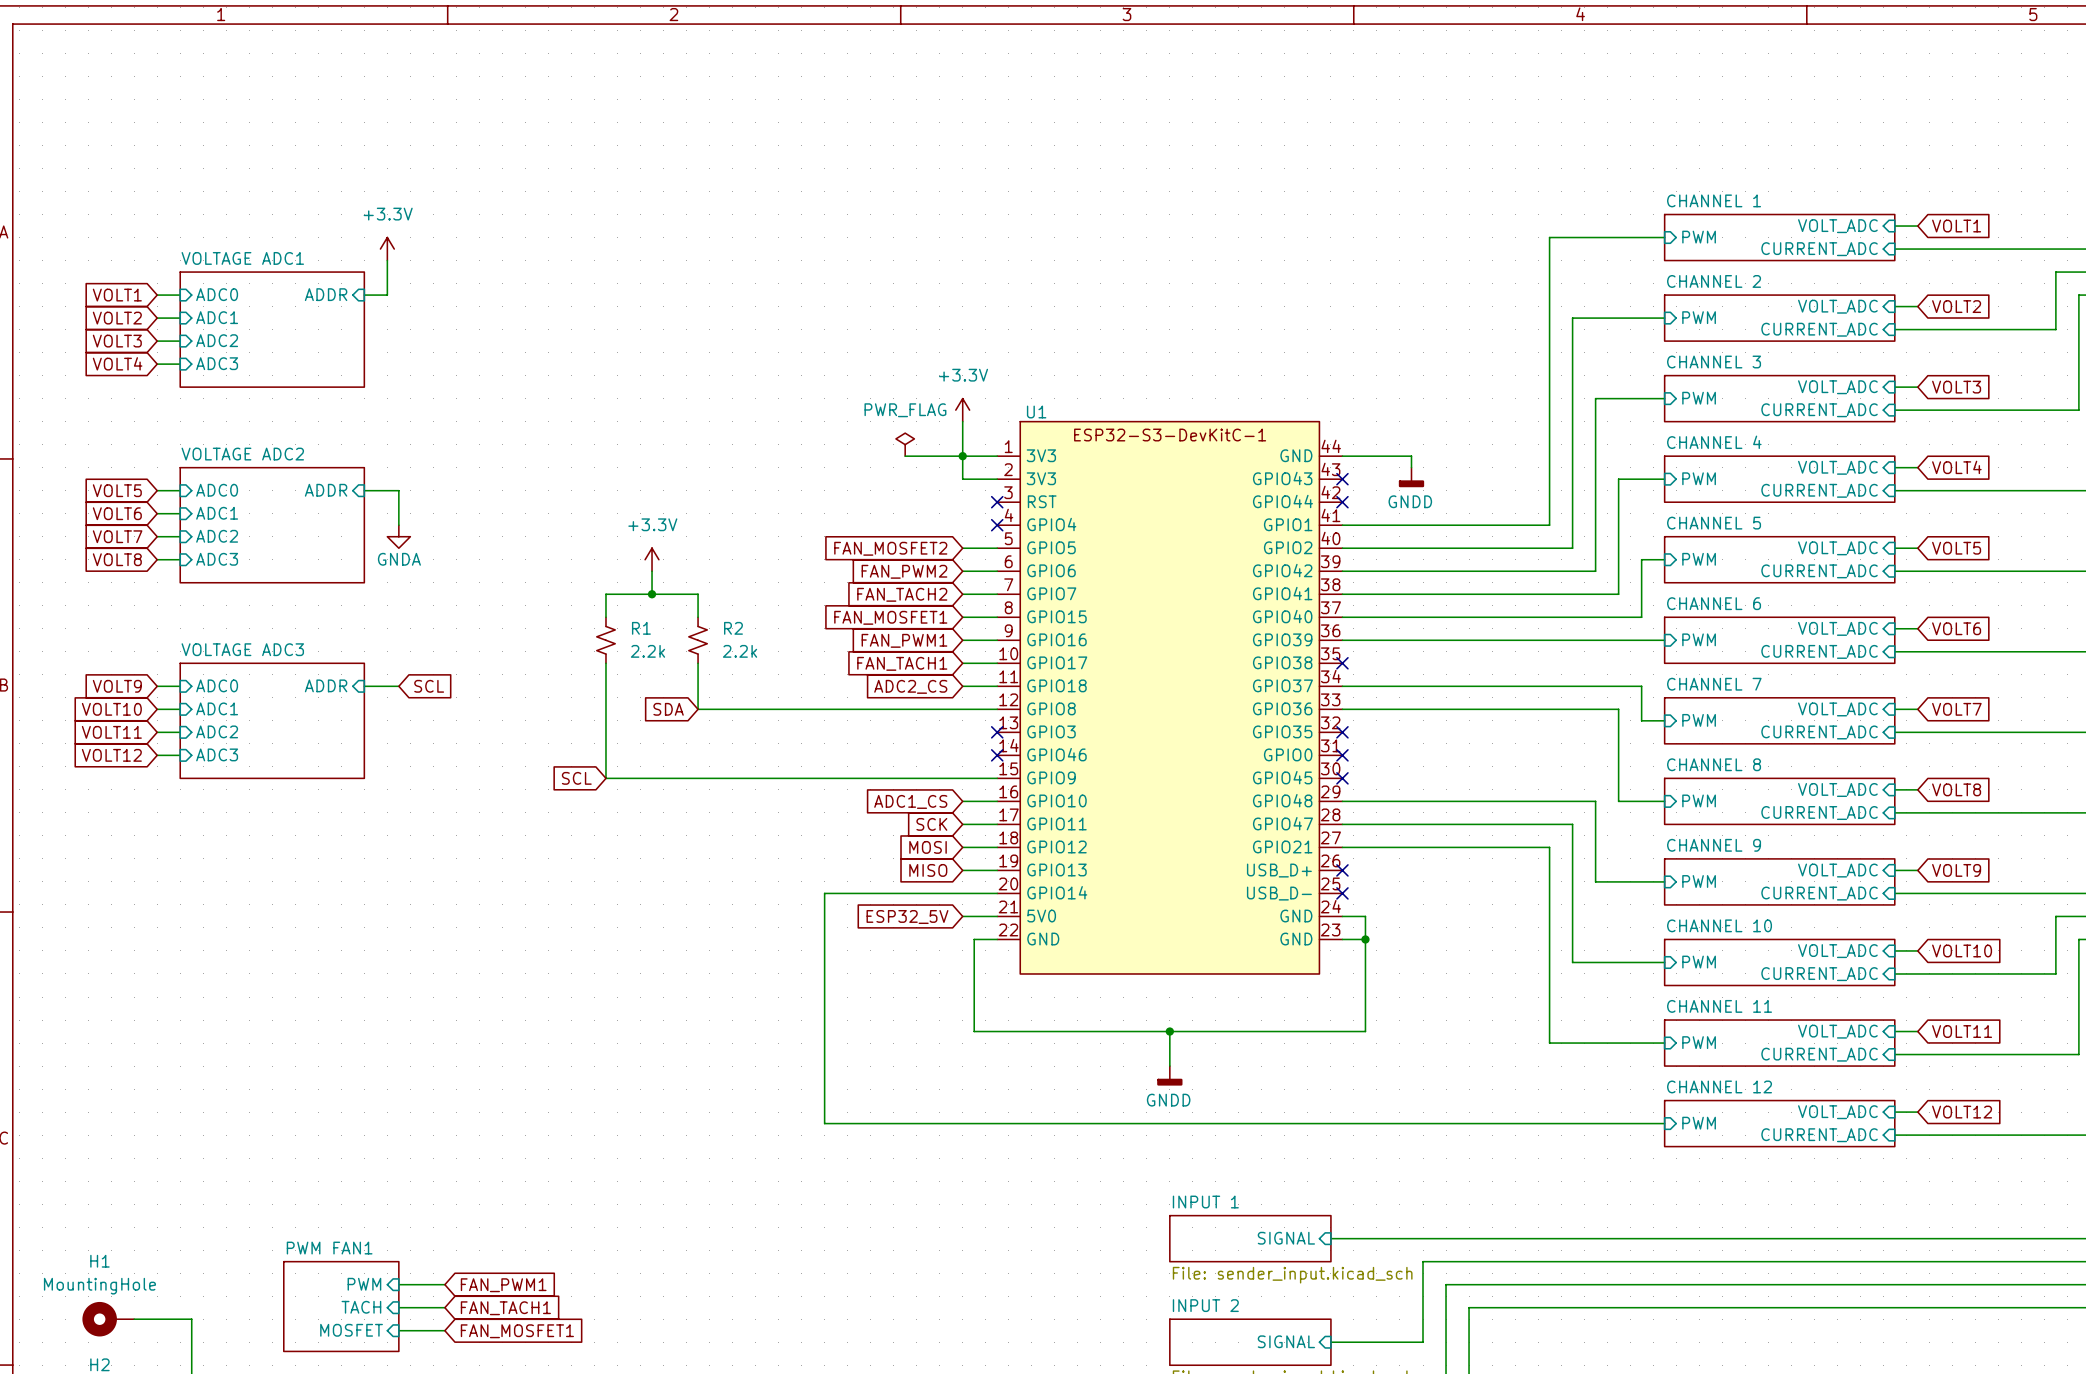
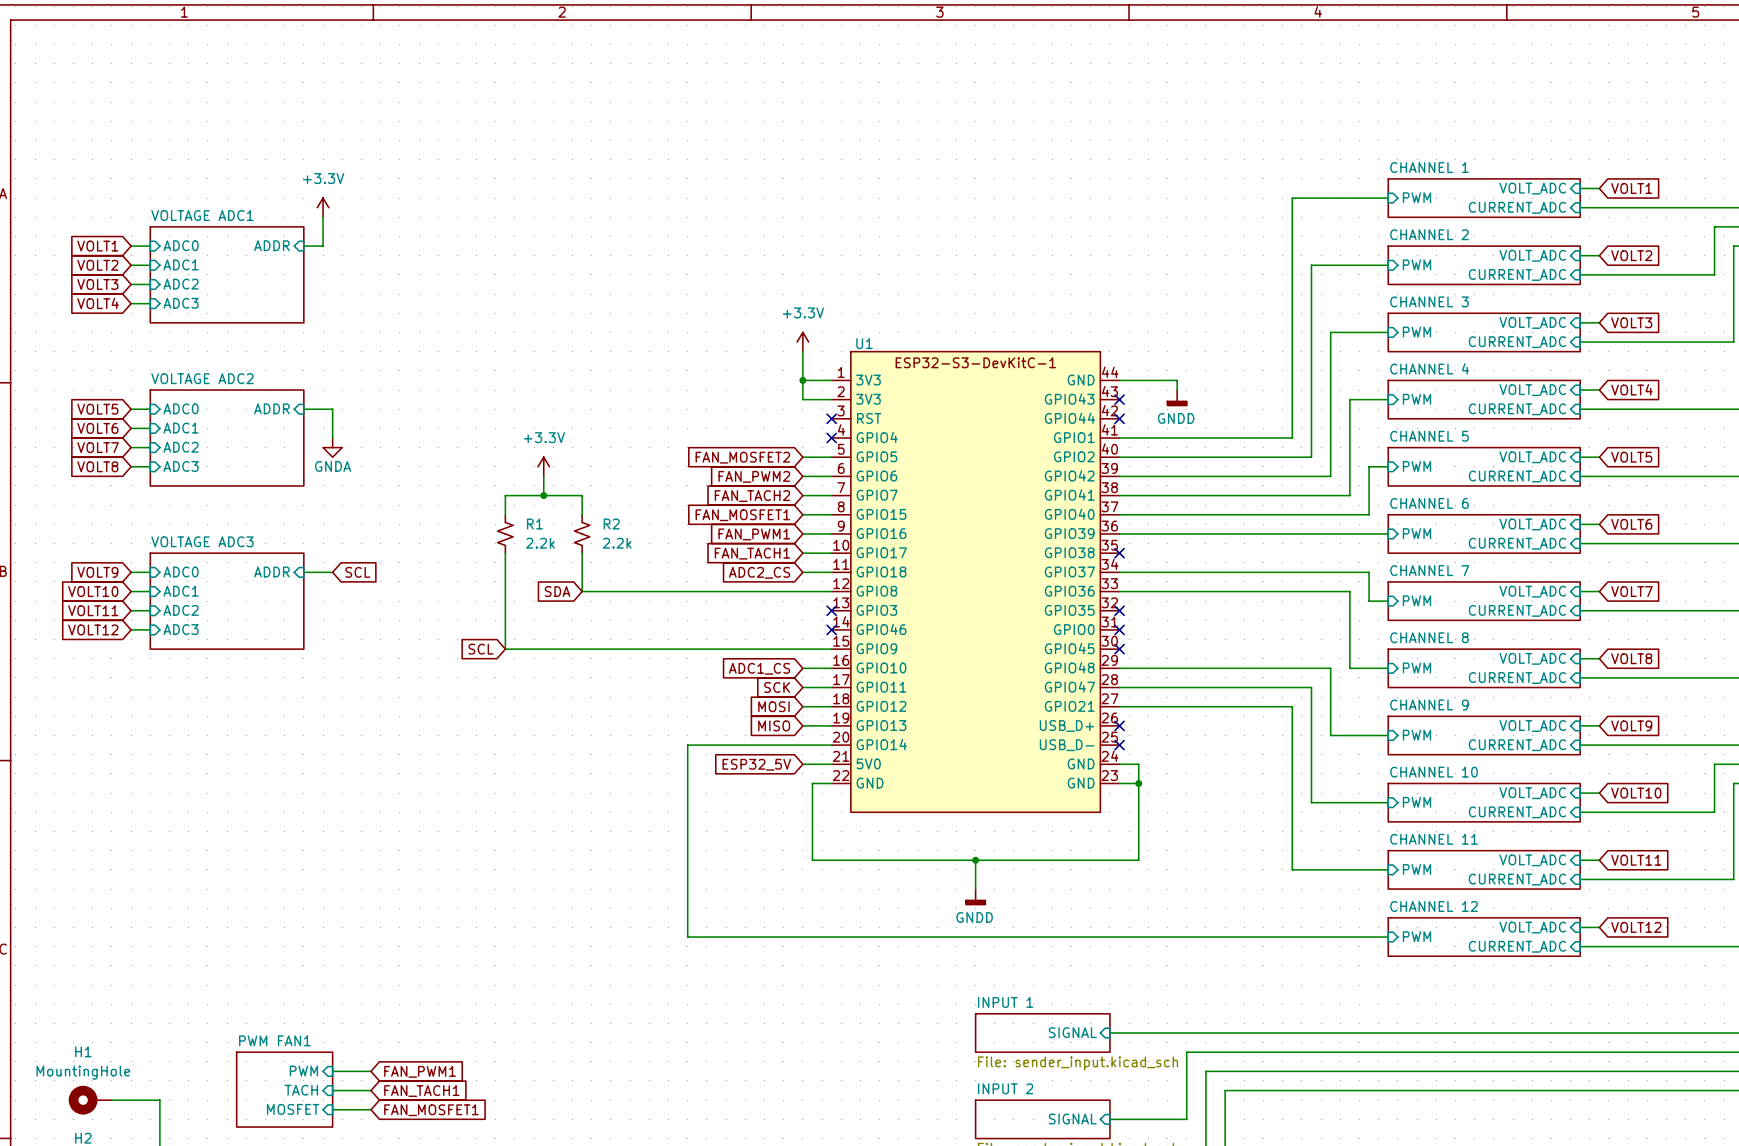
power symbol: PWR_FLAG (905, 444) -> none
wire: (905, 456) (962, 456) -> none

